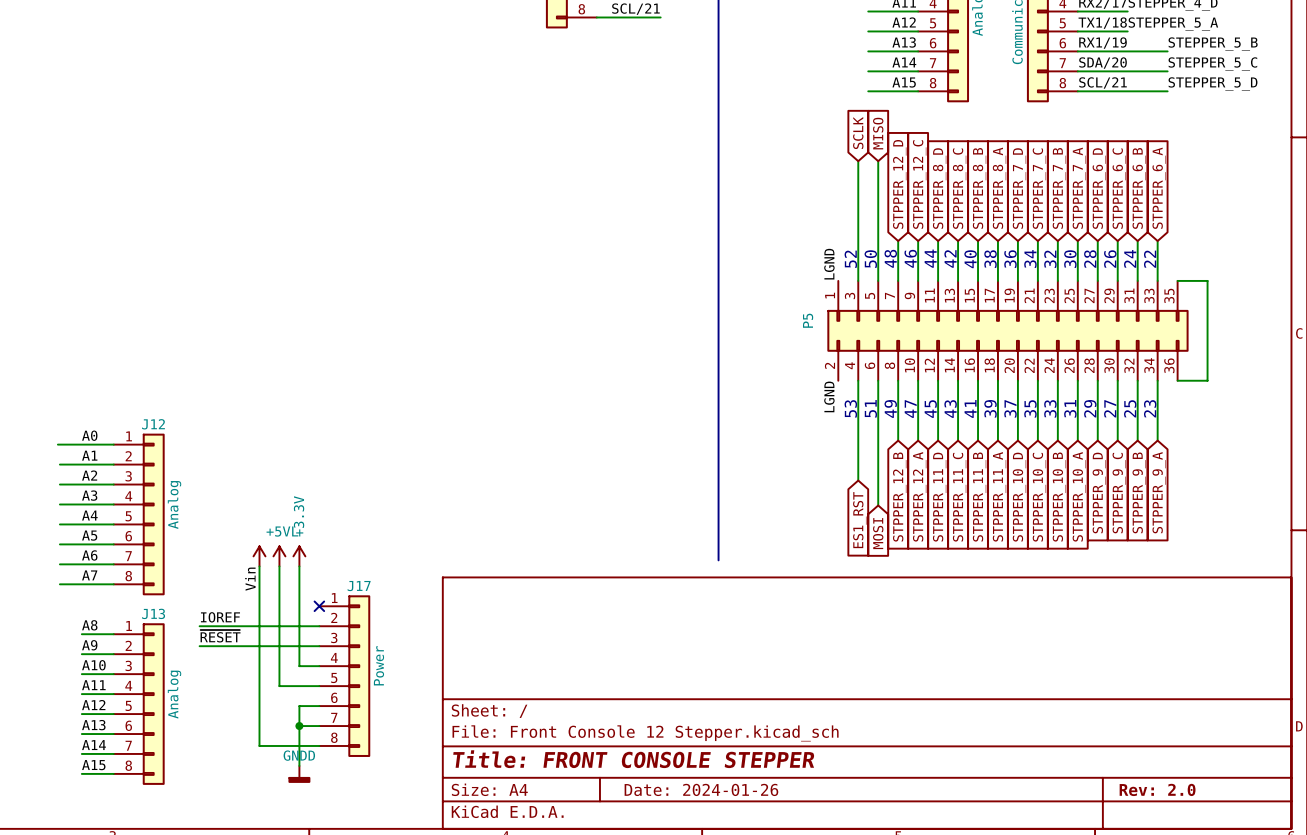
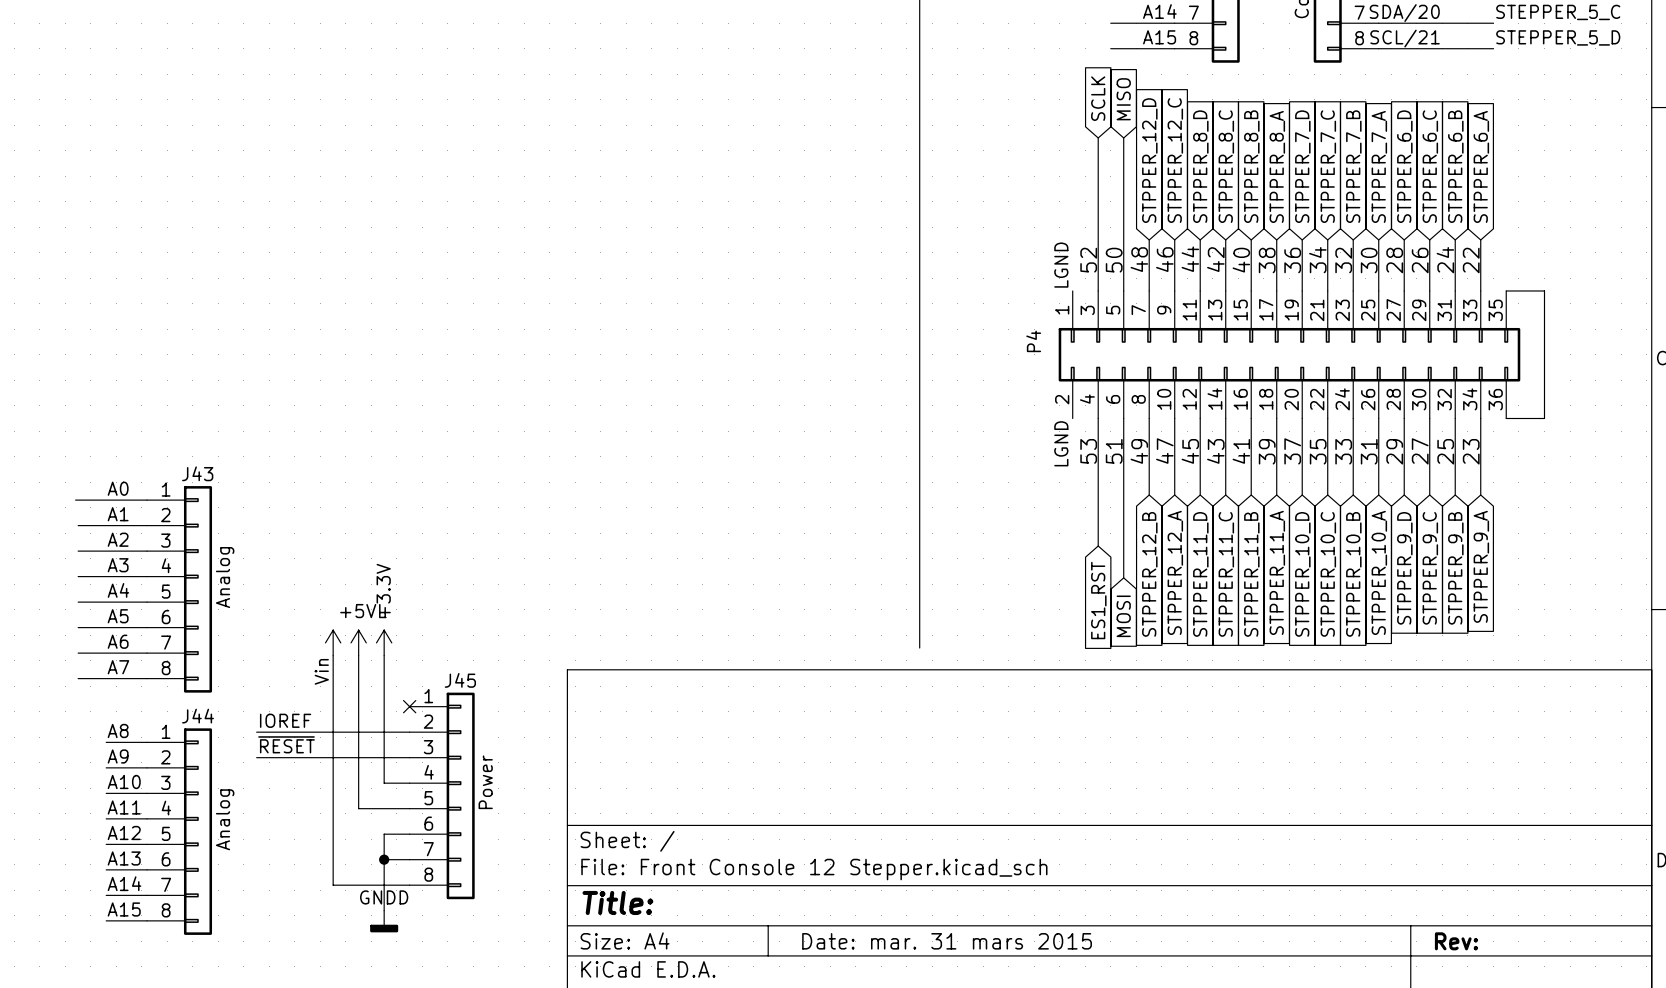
P5 name: P5 (808, 320) -> P4 (1033, 341)
J12 name: J12 (153, 424) -> J43 (197, 473)
J17 name: J17 (359, 586) -> J45 (460, 680)
J13 name: J13 (153, 613) -> J44 (198, 716)
title block: Title: FRONT CONSOLE STEPPER (633, 759) -> Title: (617, 902)
title block: Date: 2024-01-26 (701, 789) -> Date: mar. 31 mars 2015 (947, 941)
title block: Rev: 2.0 (1157, 789) -> Rev: (1456, 941)

